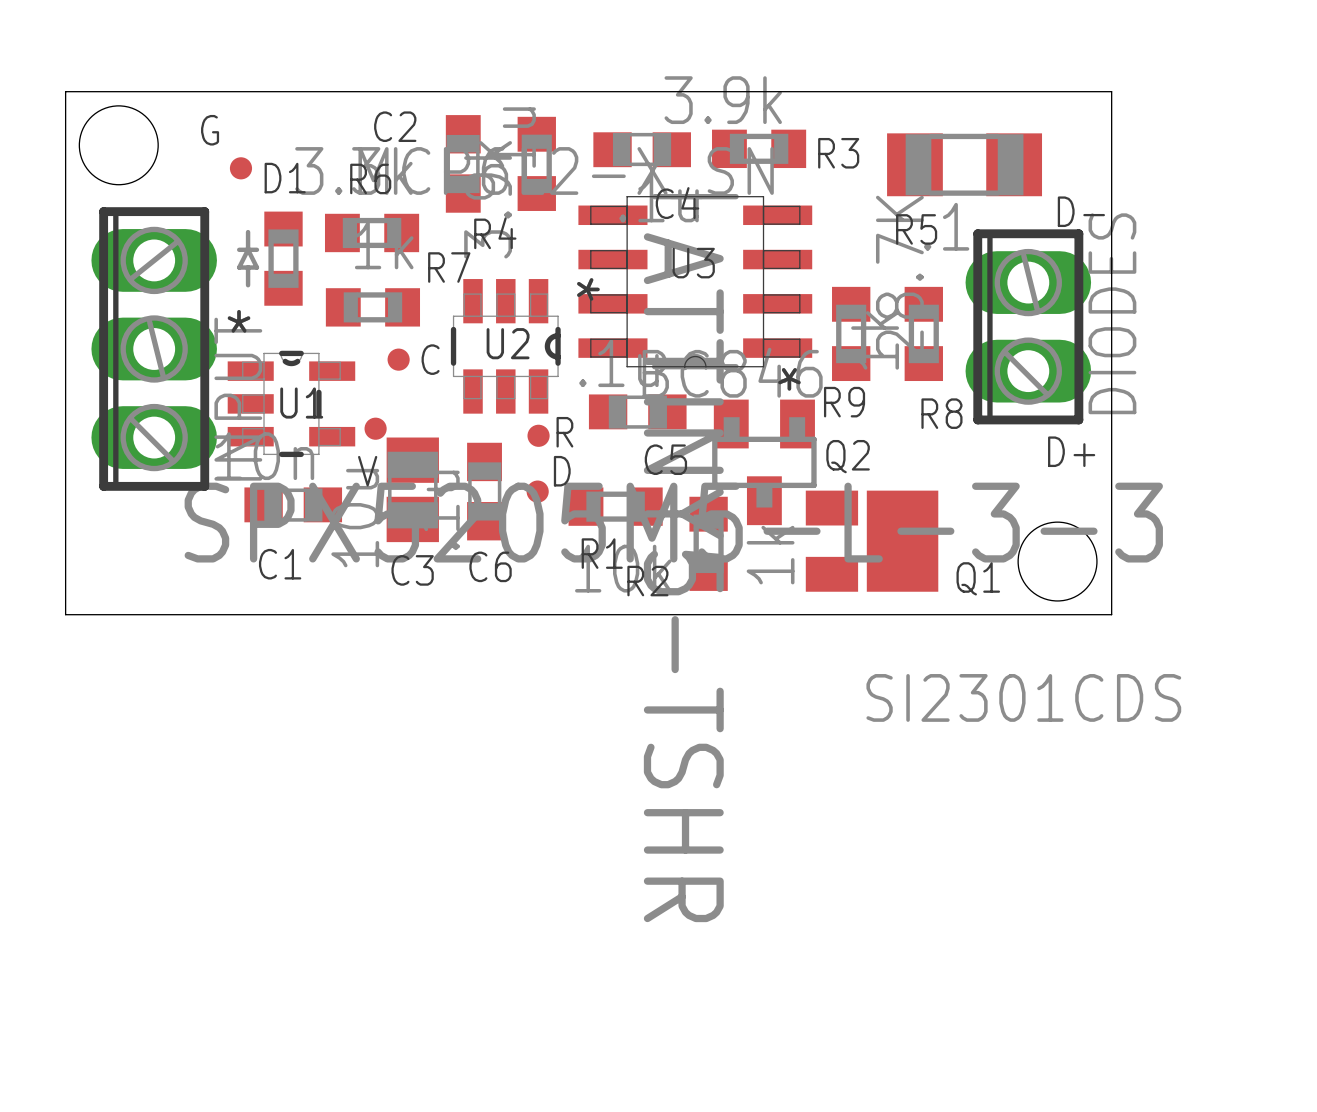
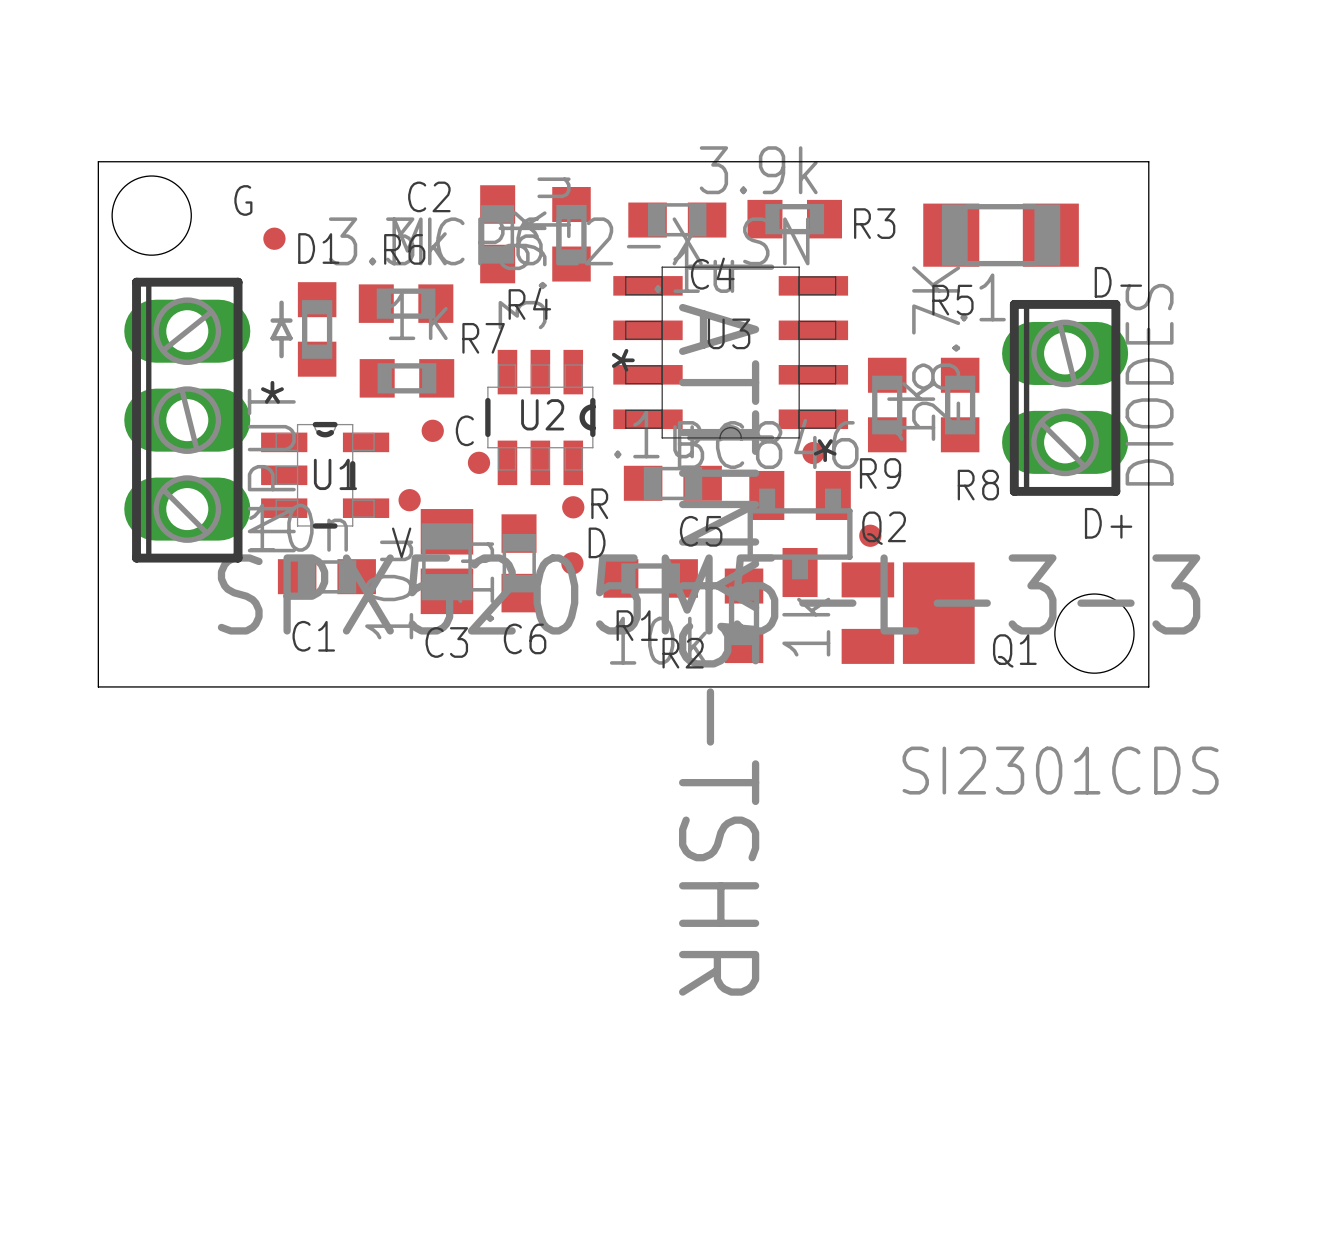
part: none -> (813, 453)
part: none -> (478, 462)
part: none -> (870, 535)

